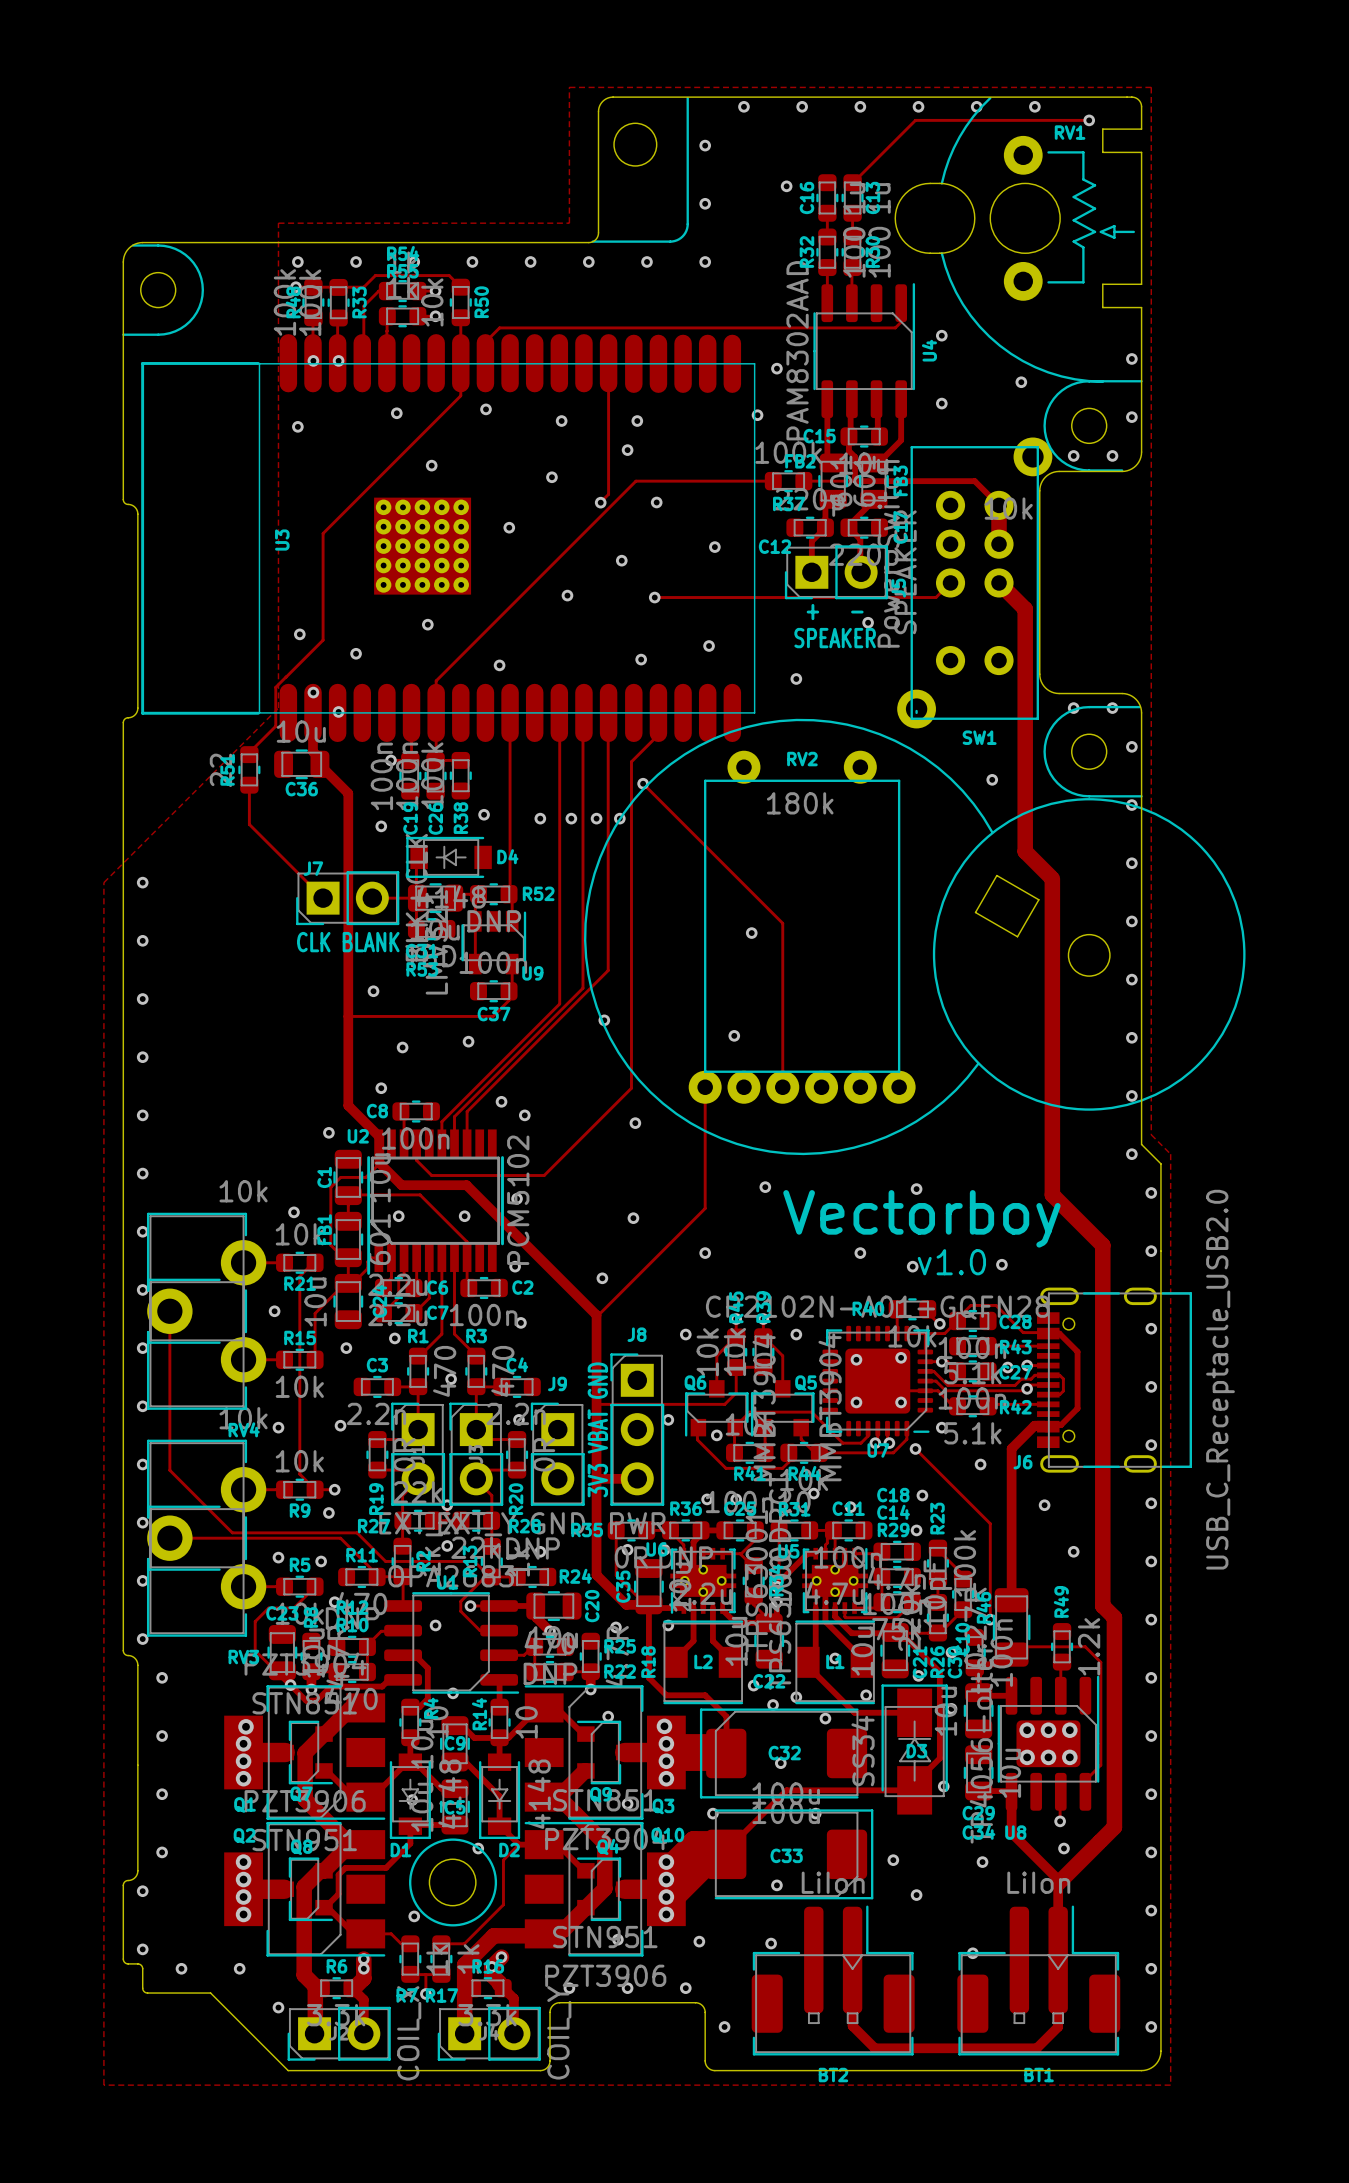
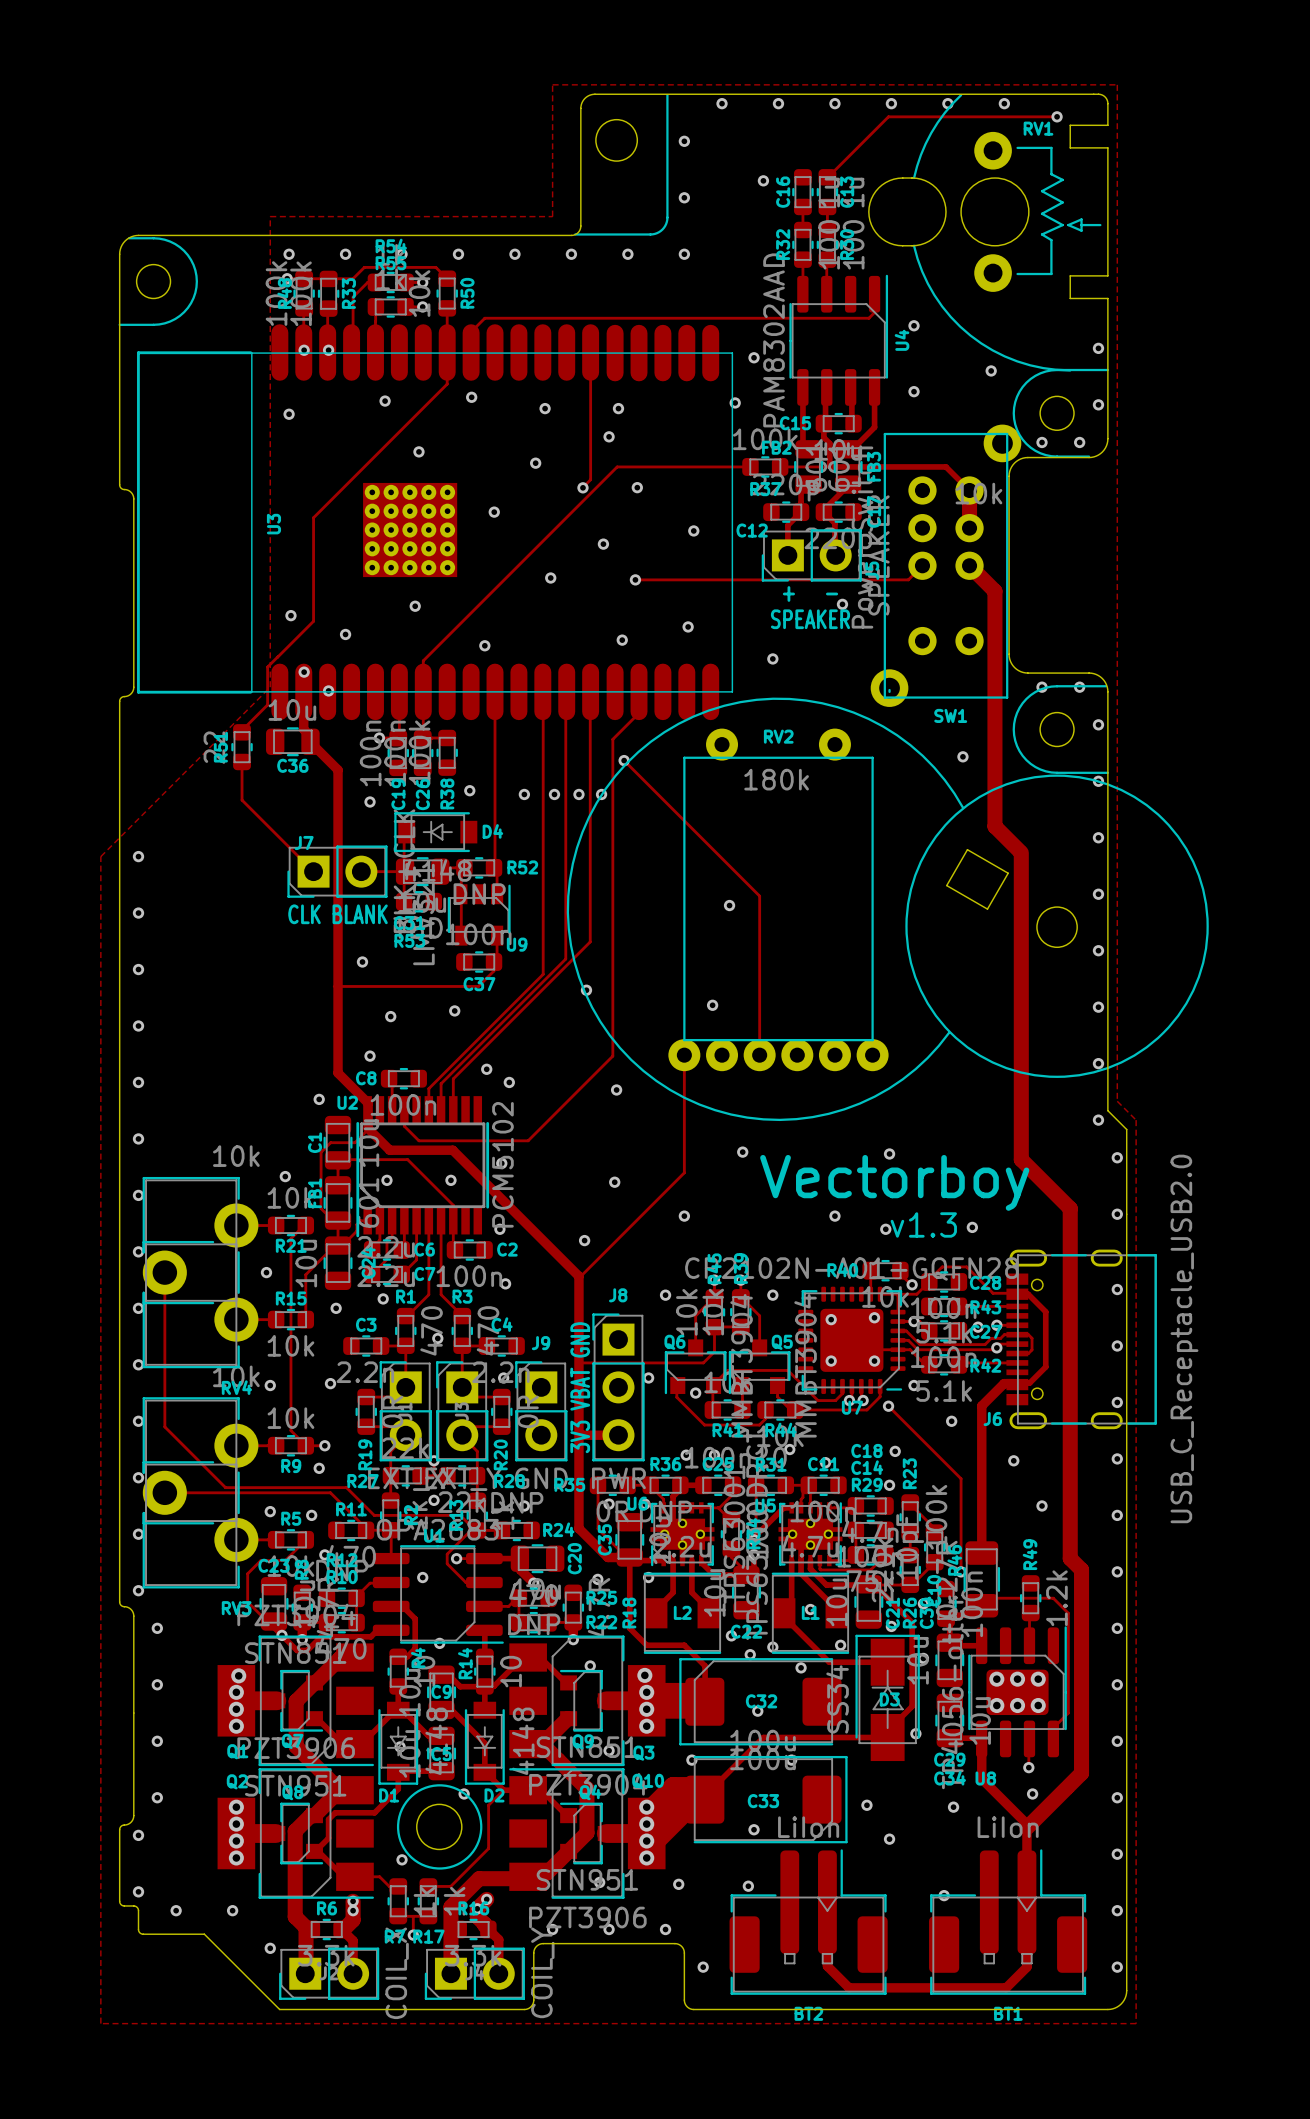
text: v1.0 (951, 1262) -> v1.3 (923, 1224)

